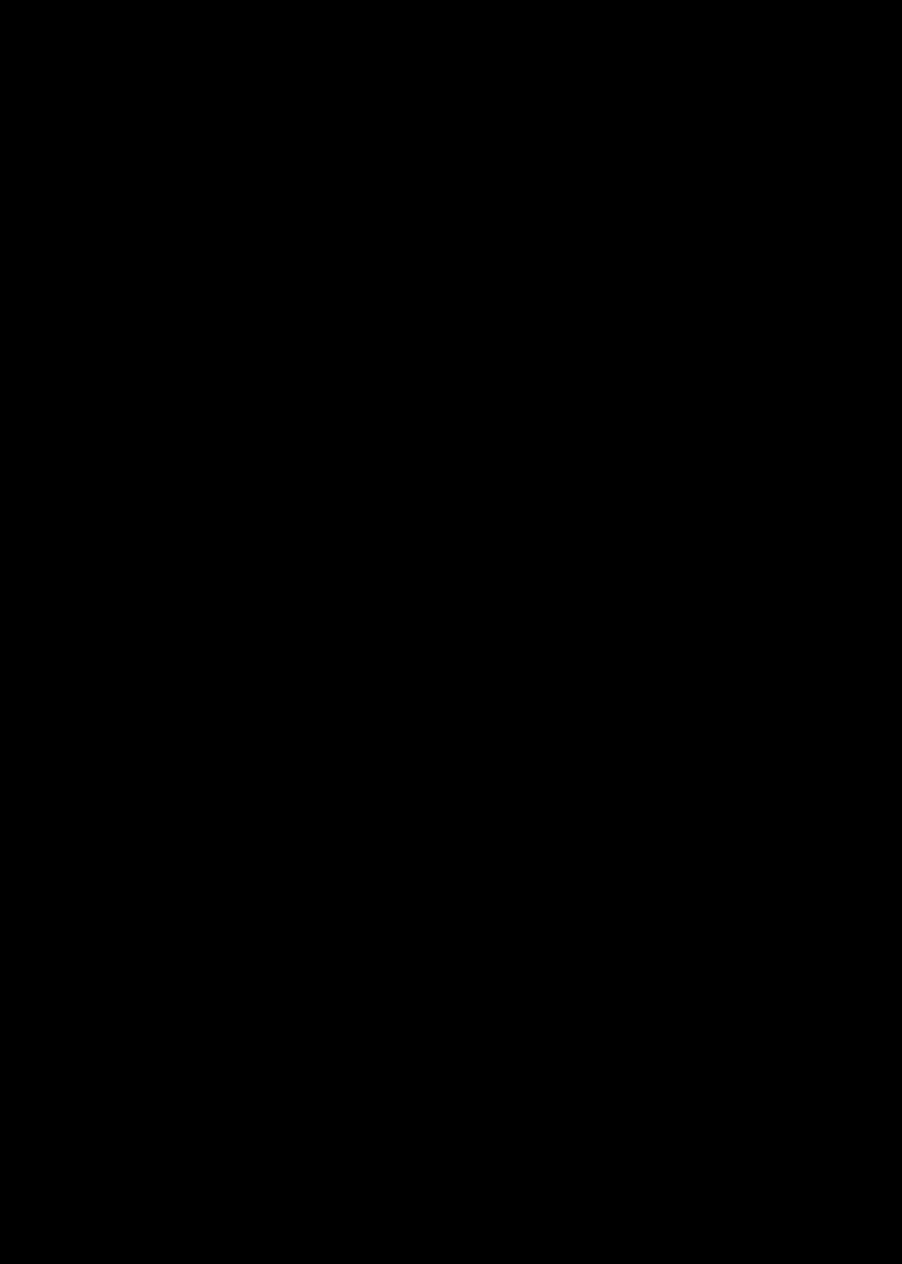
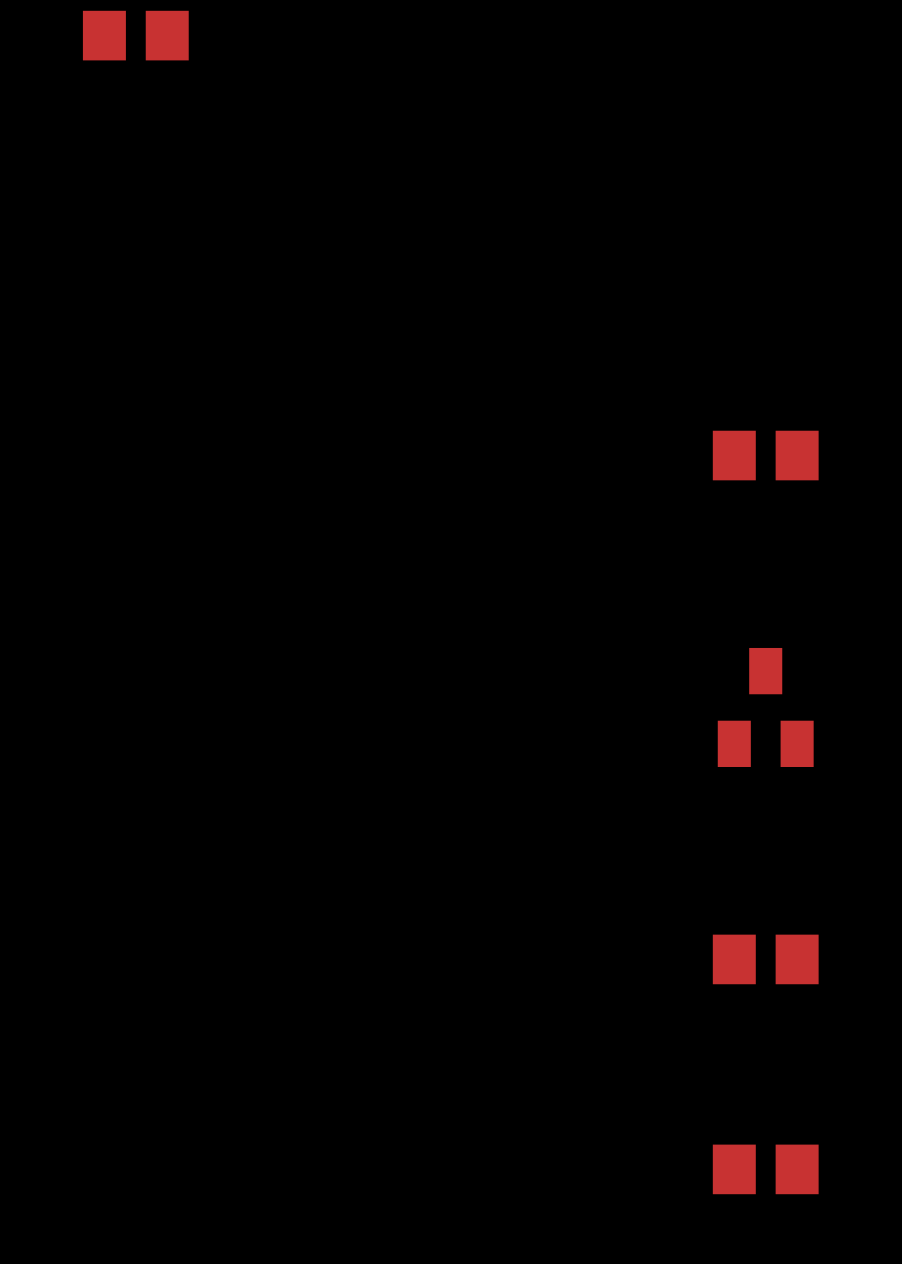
part: none -> (135, 35)
part: none -> (765, 455)
part: none -> (765, 707)
part: none -> (765, 959)
part: none -> (765, 1169)

